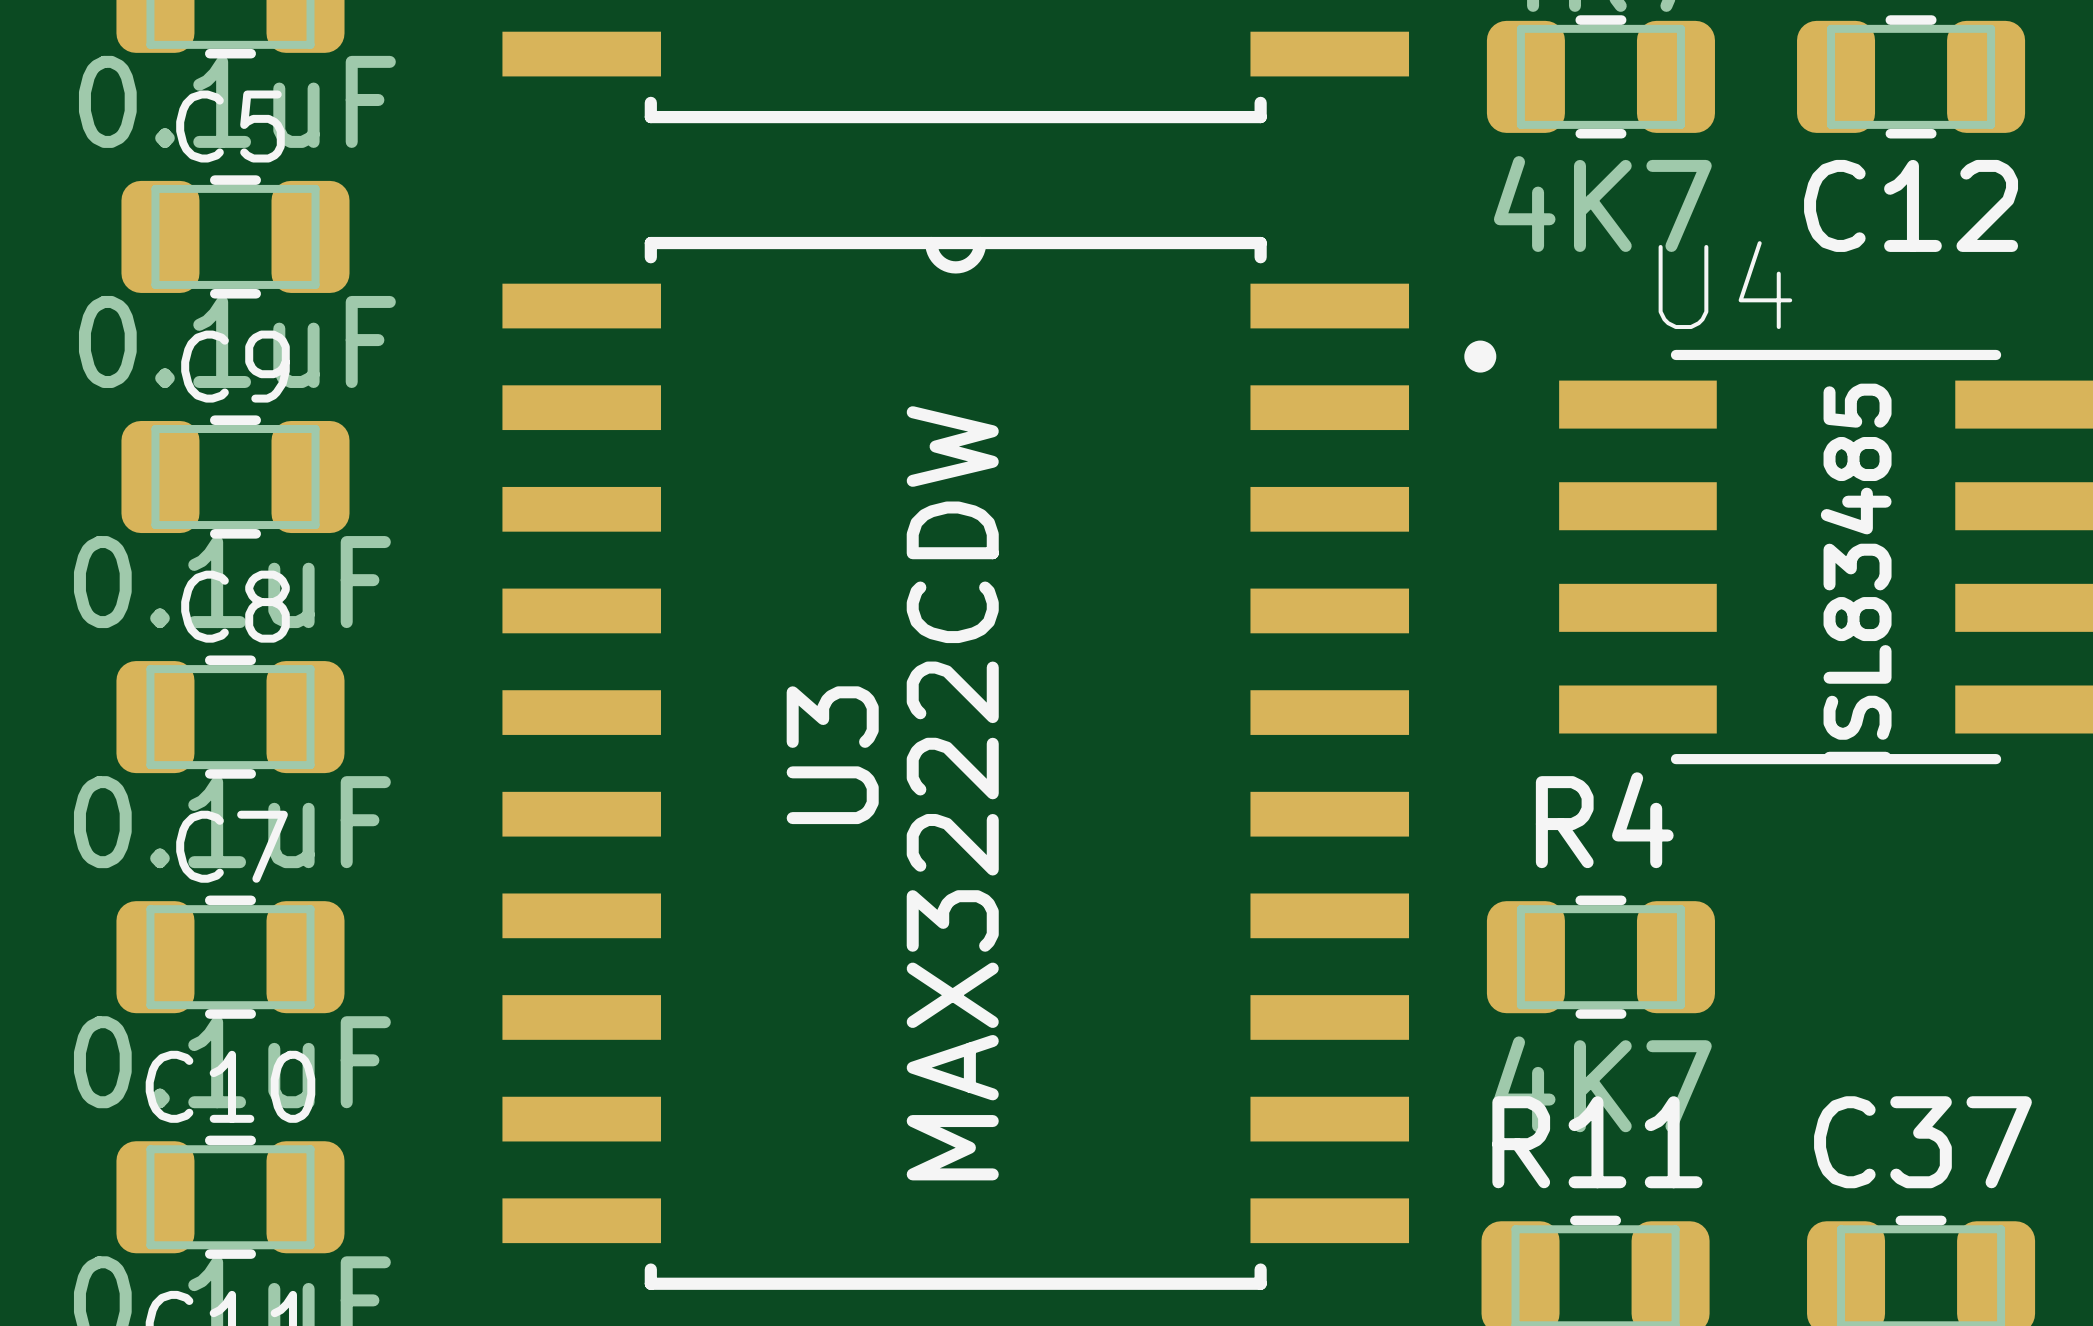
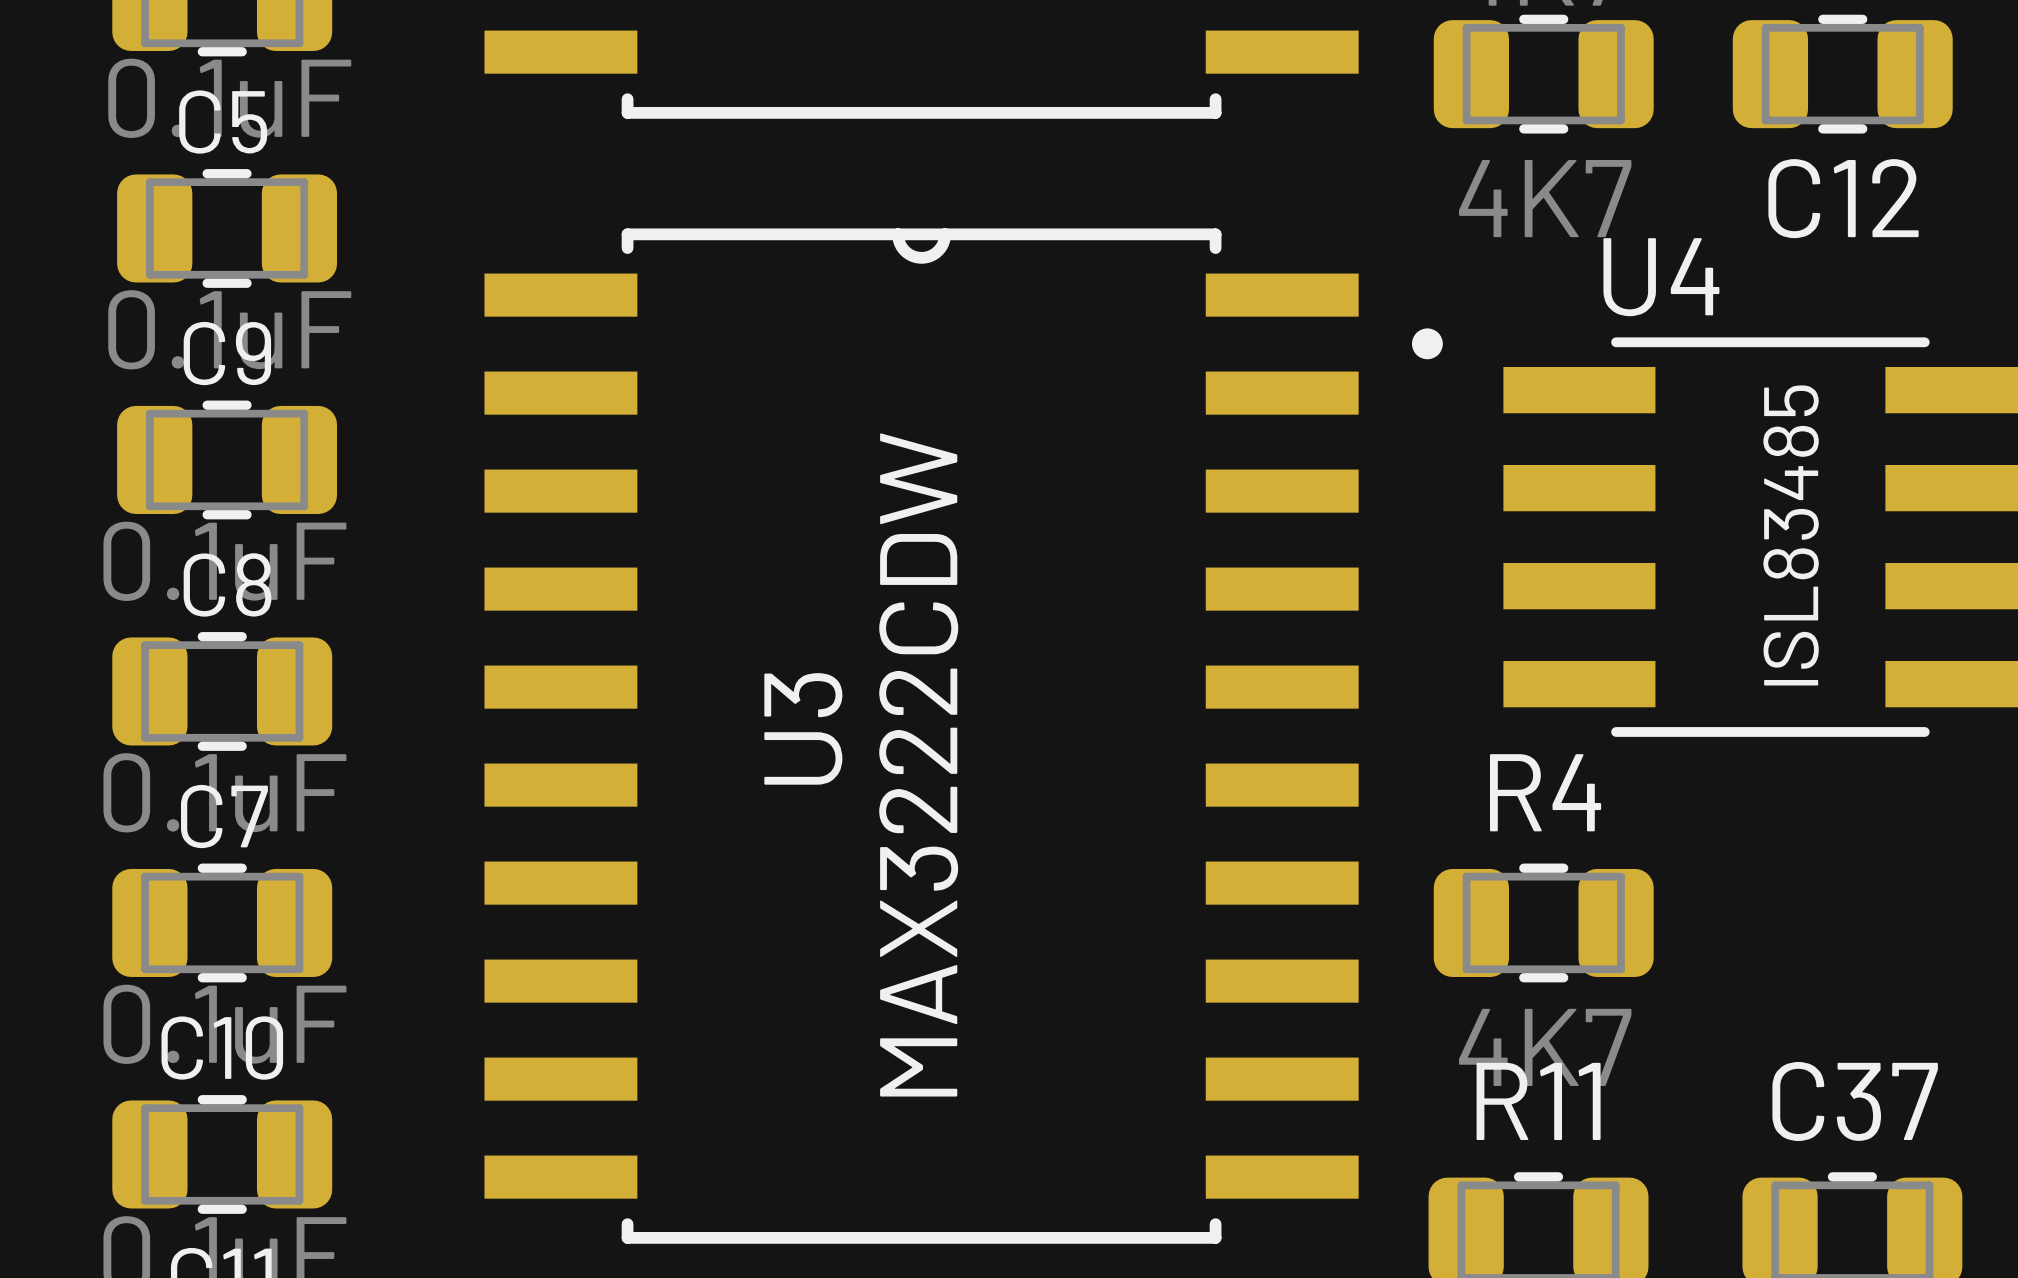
U4 value position: ISL83485 (1856, 573) -> ISL83485 (1791, 535)

